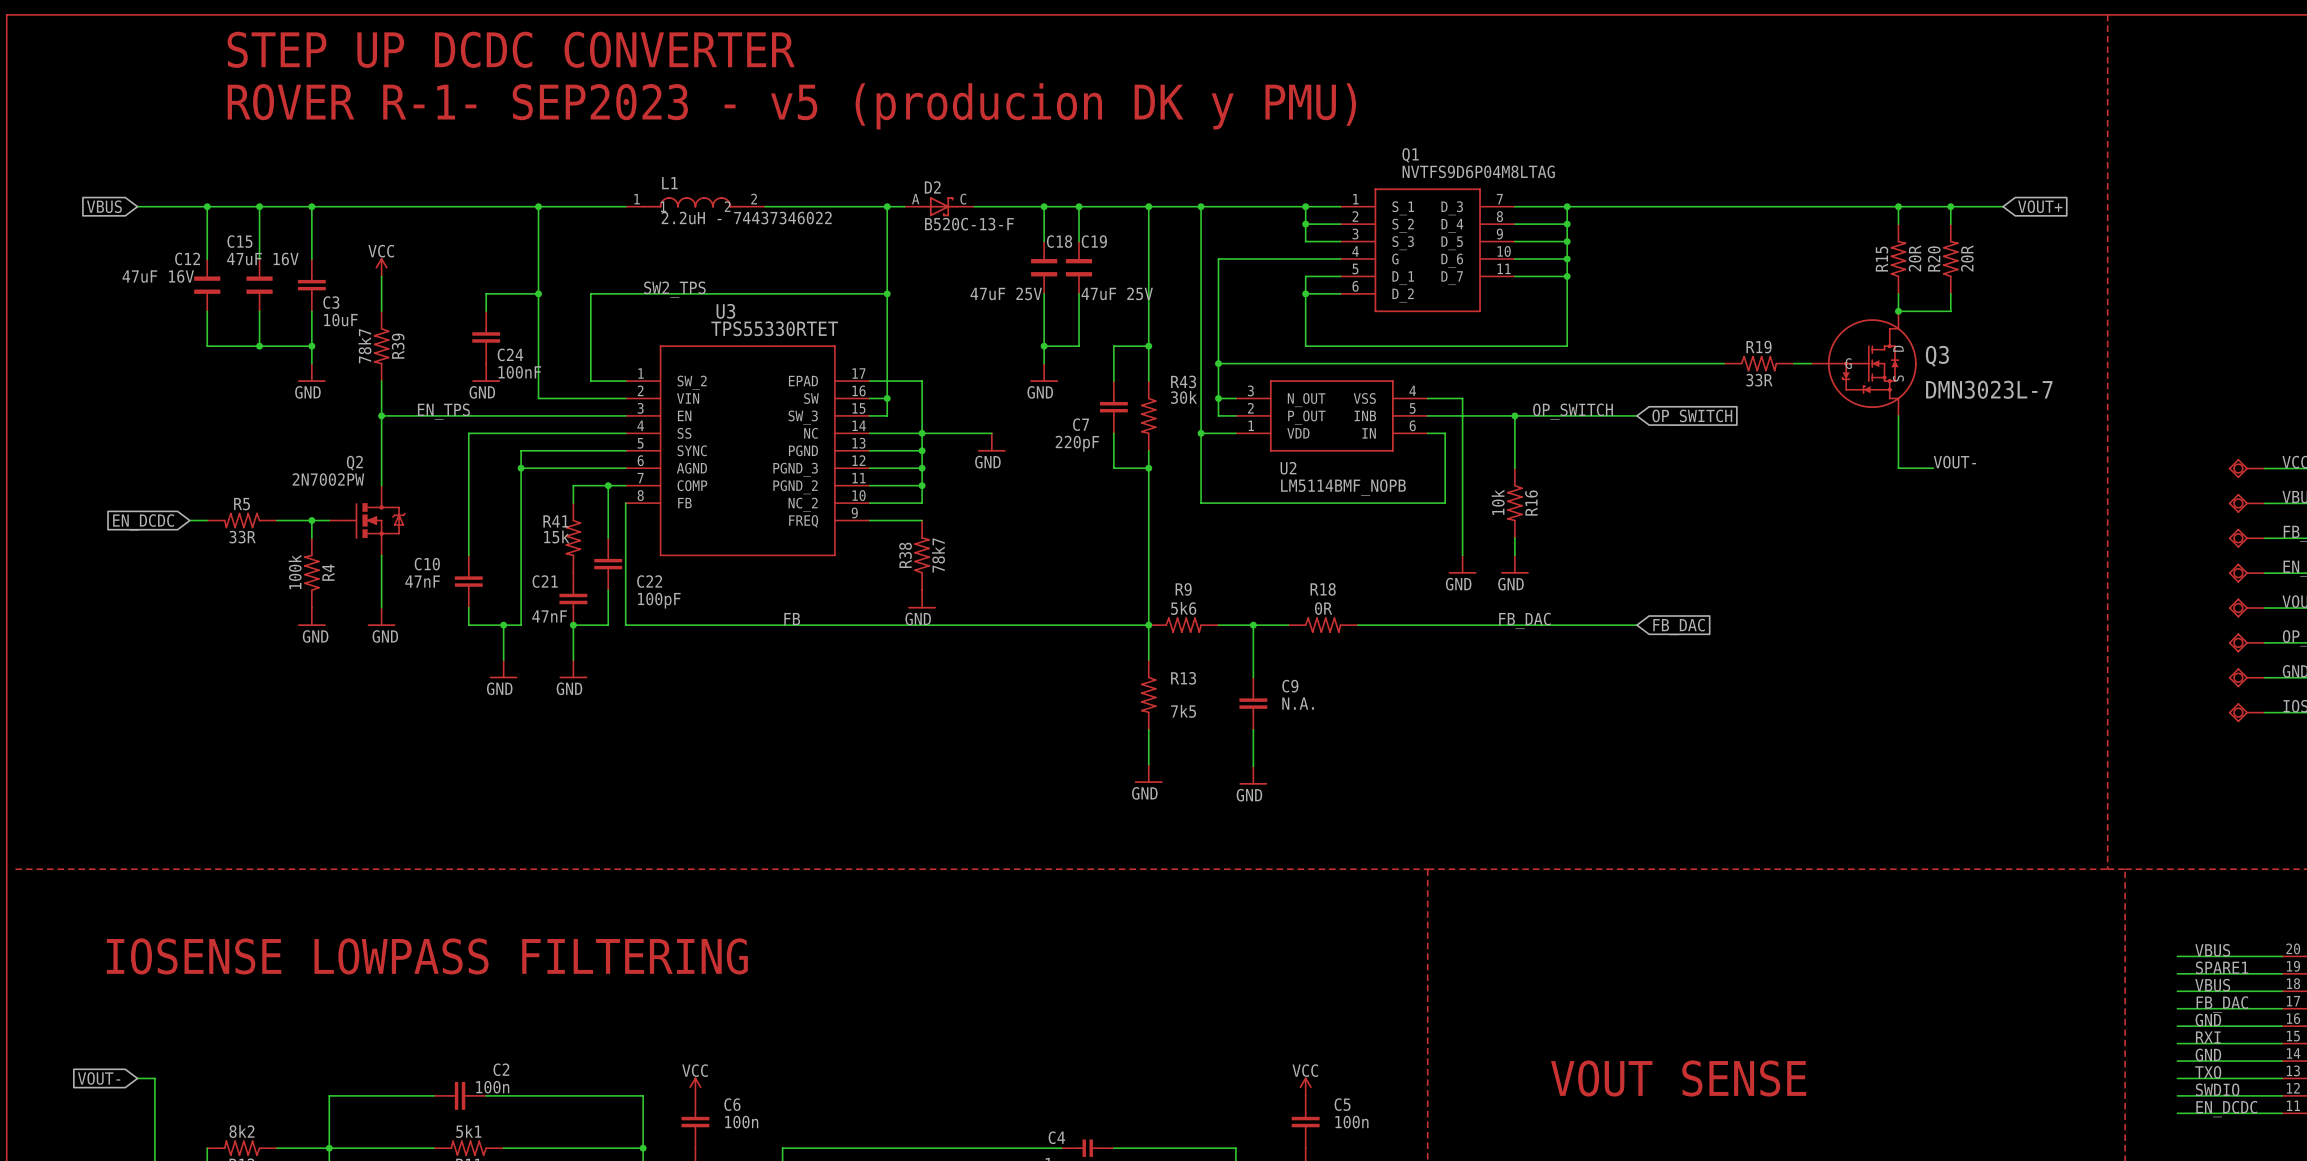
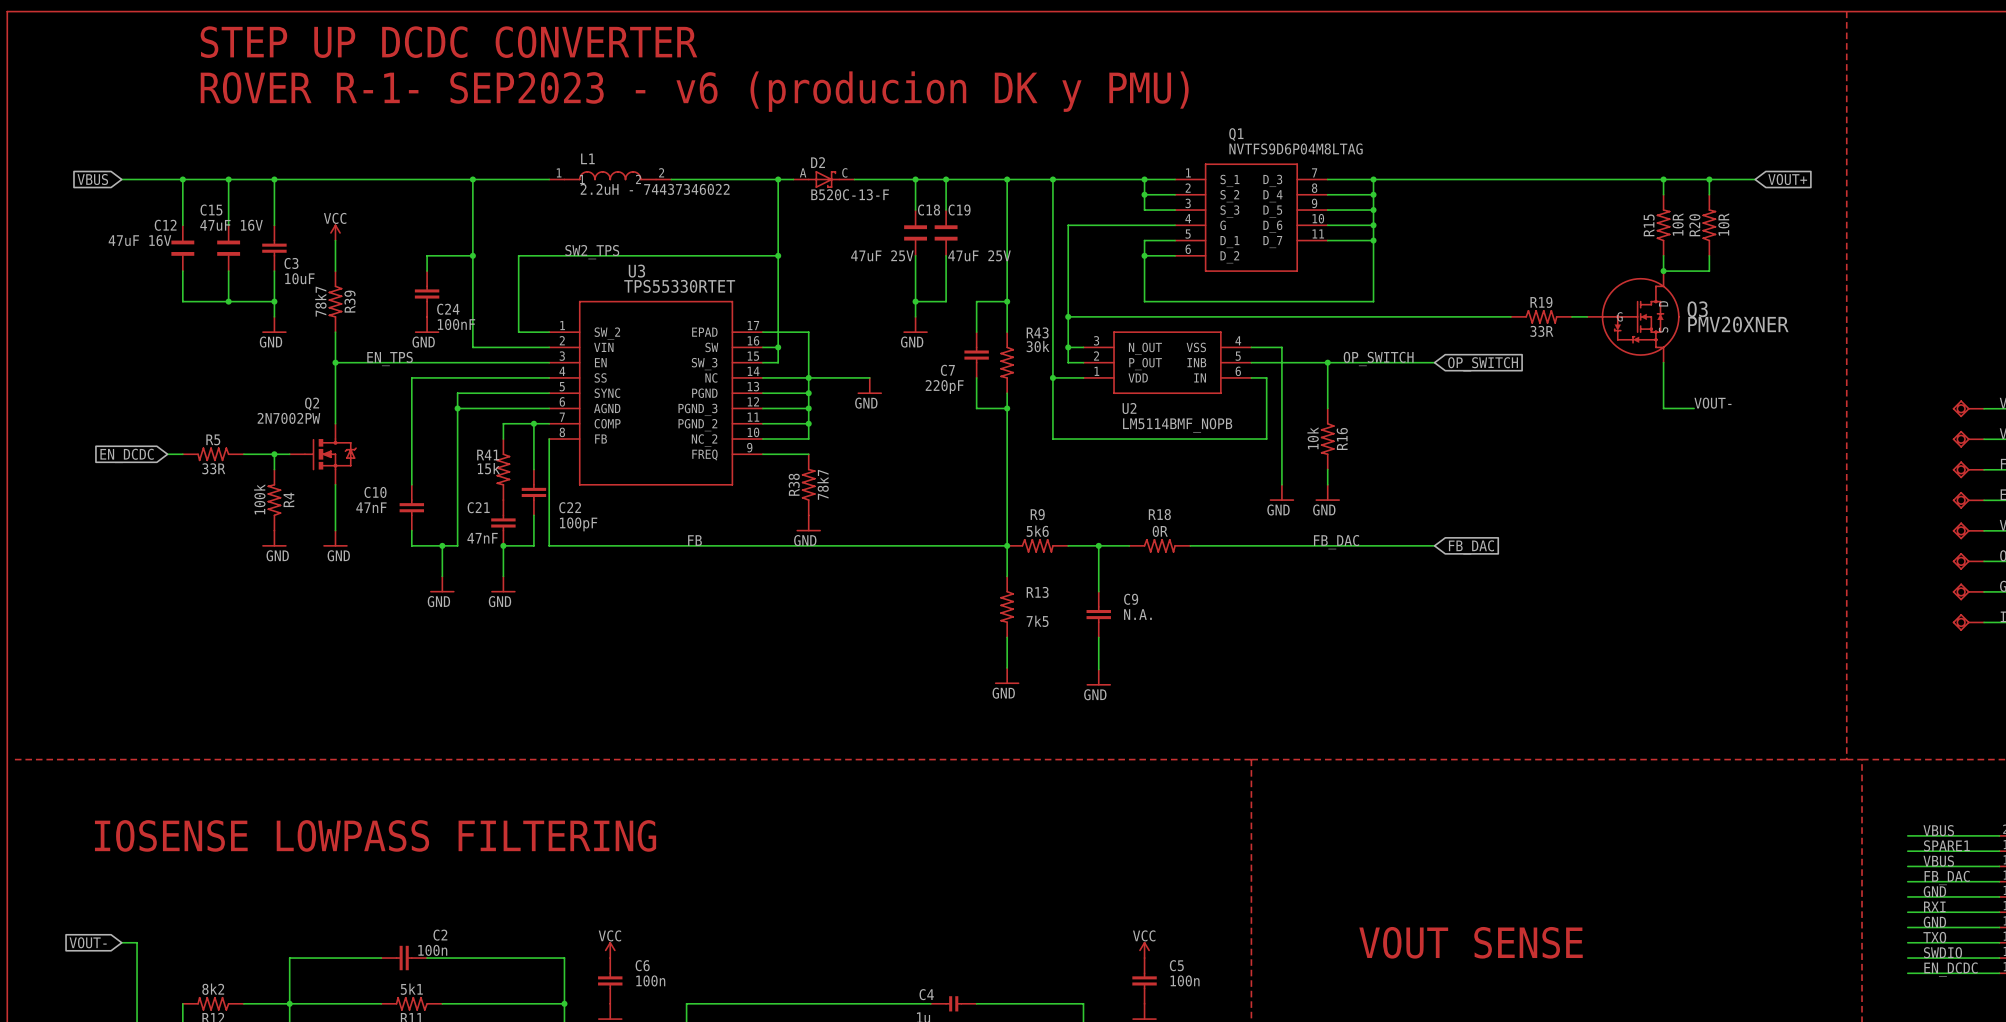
text: ROVER R-1- SEP2023 - v5 (producion DK y PMU) (791, 106) -> ROVER R-1- SEP2023 - v6 (producion DK y PMU) (694, 91)
R15 value: 20R (1915, 258) -> 10R (1678, 224)
R20 value: 20R (1967, 258) -> 10R (1723, 224)
Q3 value: DMN3023L-7 (1989, 389) -> PMV20XNER (1738, 324)

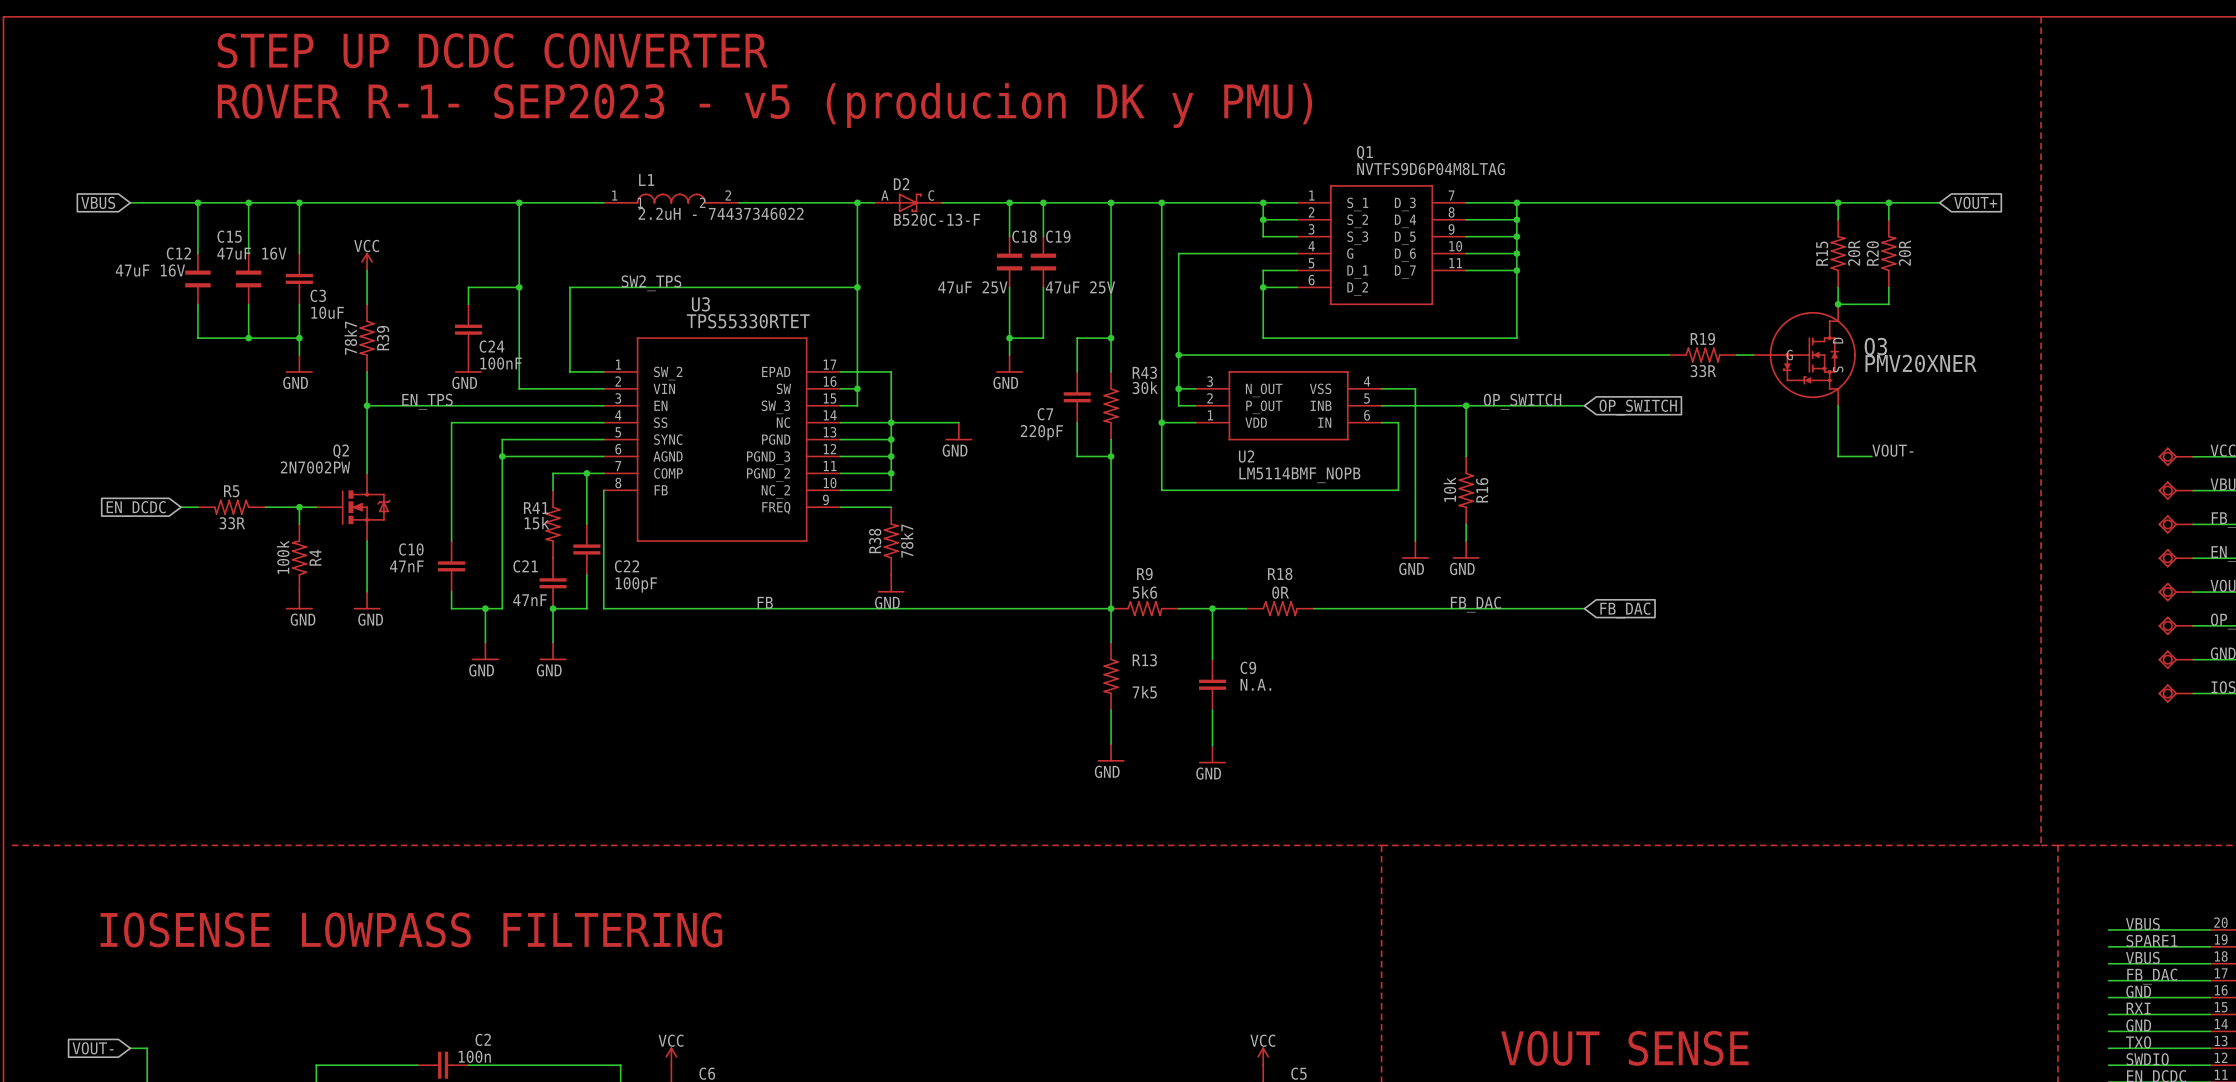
text: ROVER R-1- SEP2023 - v6 (producion DK y PMU) (694, 91) -> ROVER R-1- SEP2023 - v5 (producion DK y PMU) (764, 105)
R15 value: 10R (1678, 224) -> 20R (1854, 253)
R20 value: 10R (1723, 224) -> 20R (1904, 253)

